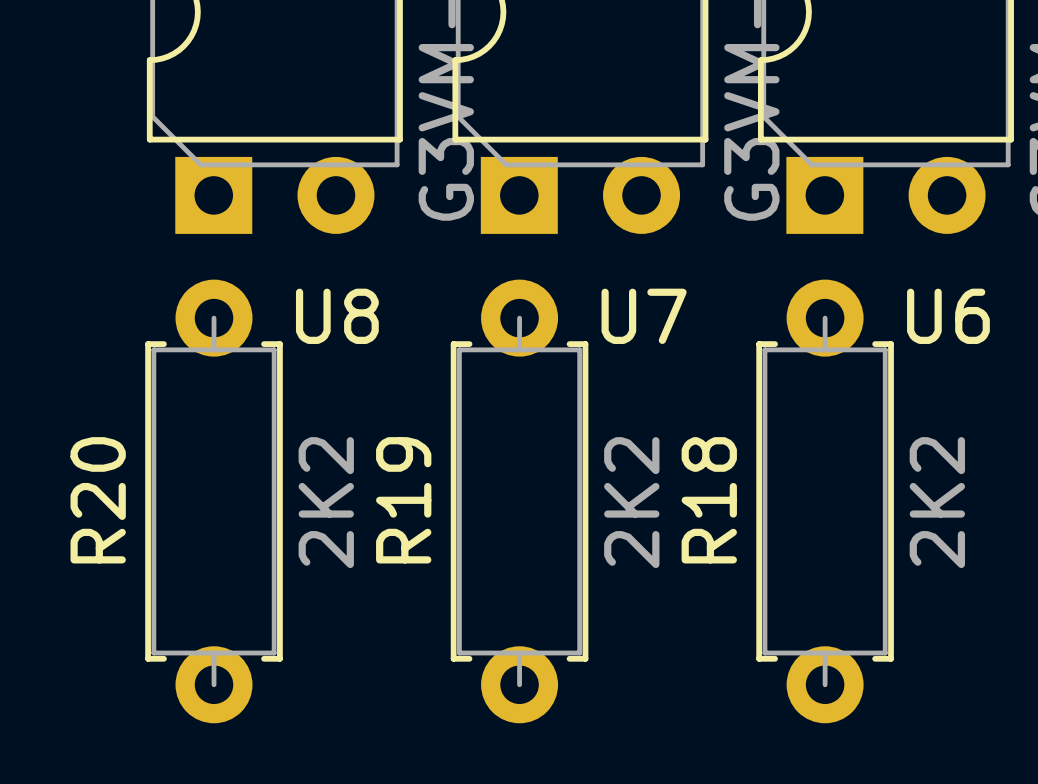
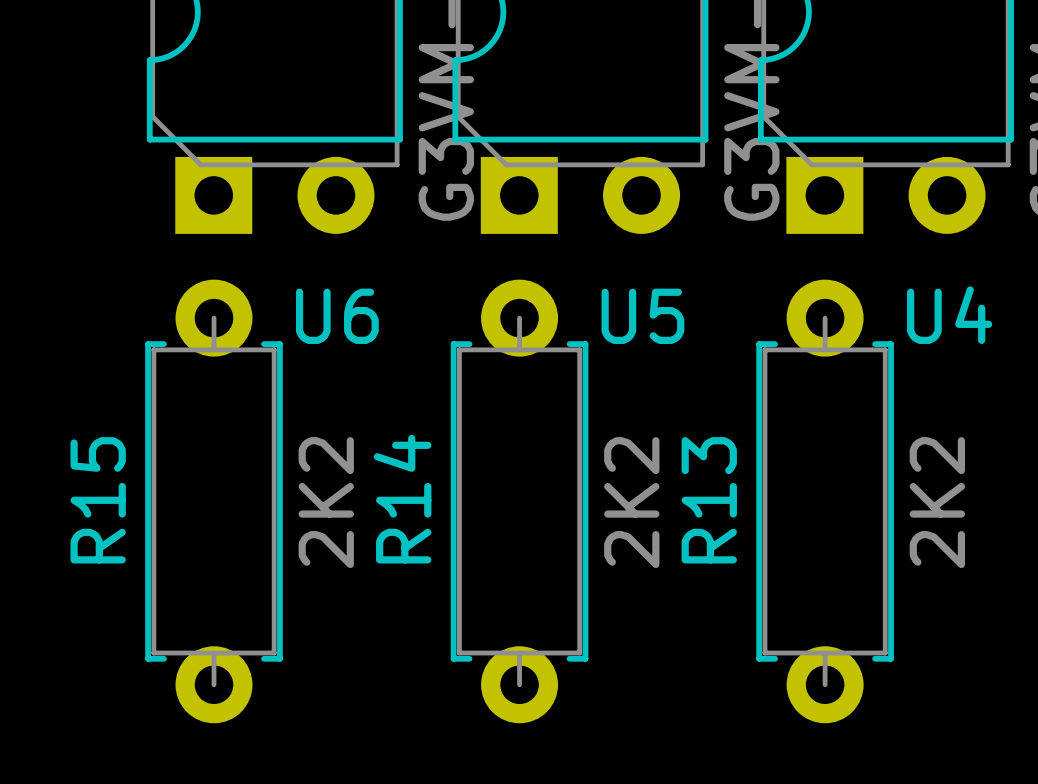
U8 name: U8 (337, 316) -> U6 (337, 316)
U7 name: U7 (644, 316) -> U5 (642, 316)
U6 name: U6 (948, 316) -> U4 (949, 315)
R20 name: R20 (98, 500) -> R15 (98, 500)
R19 name: R19 (403, 500) -> R14 (402, 499)
R18 name: R18 (709, 500) -> R13 (709, 500)

